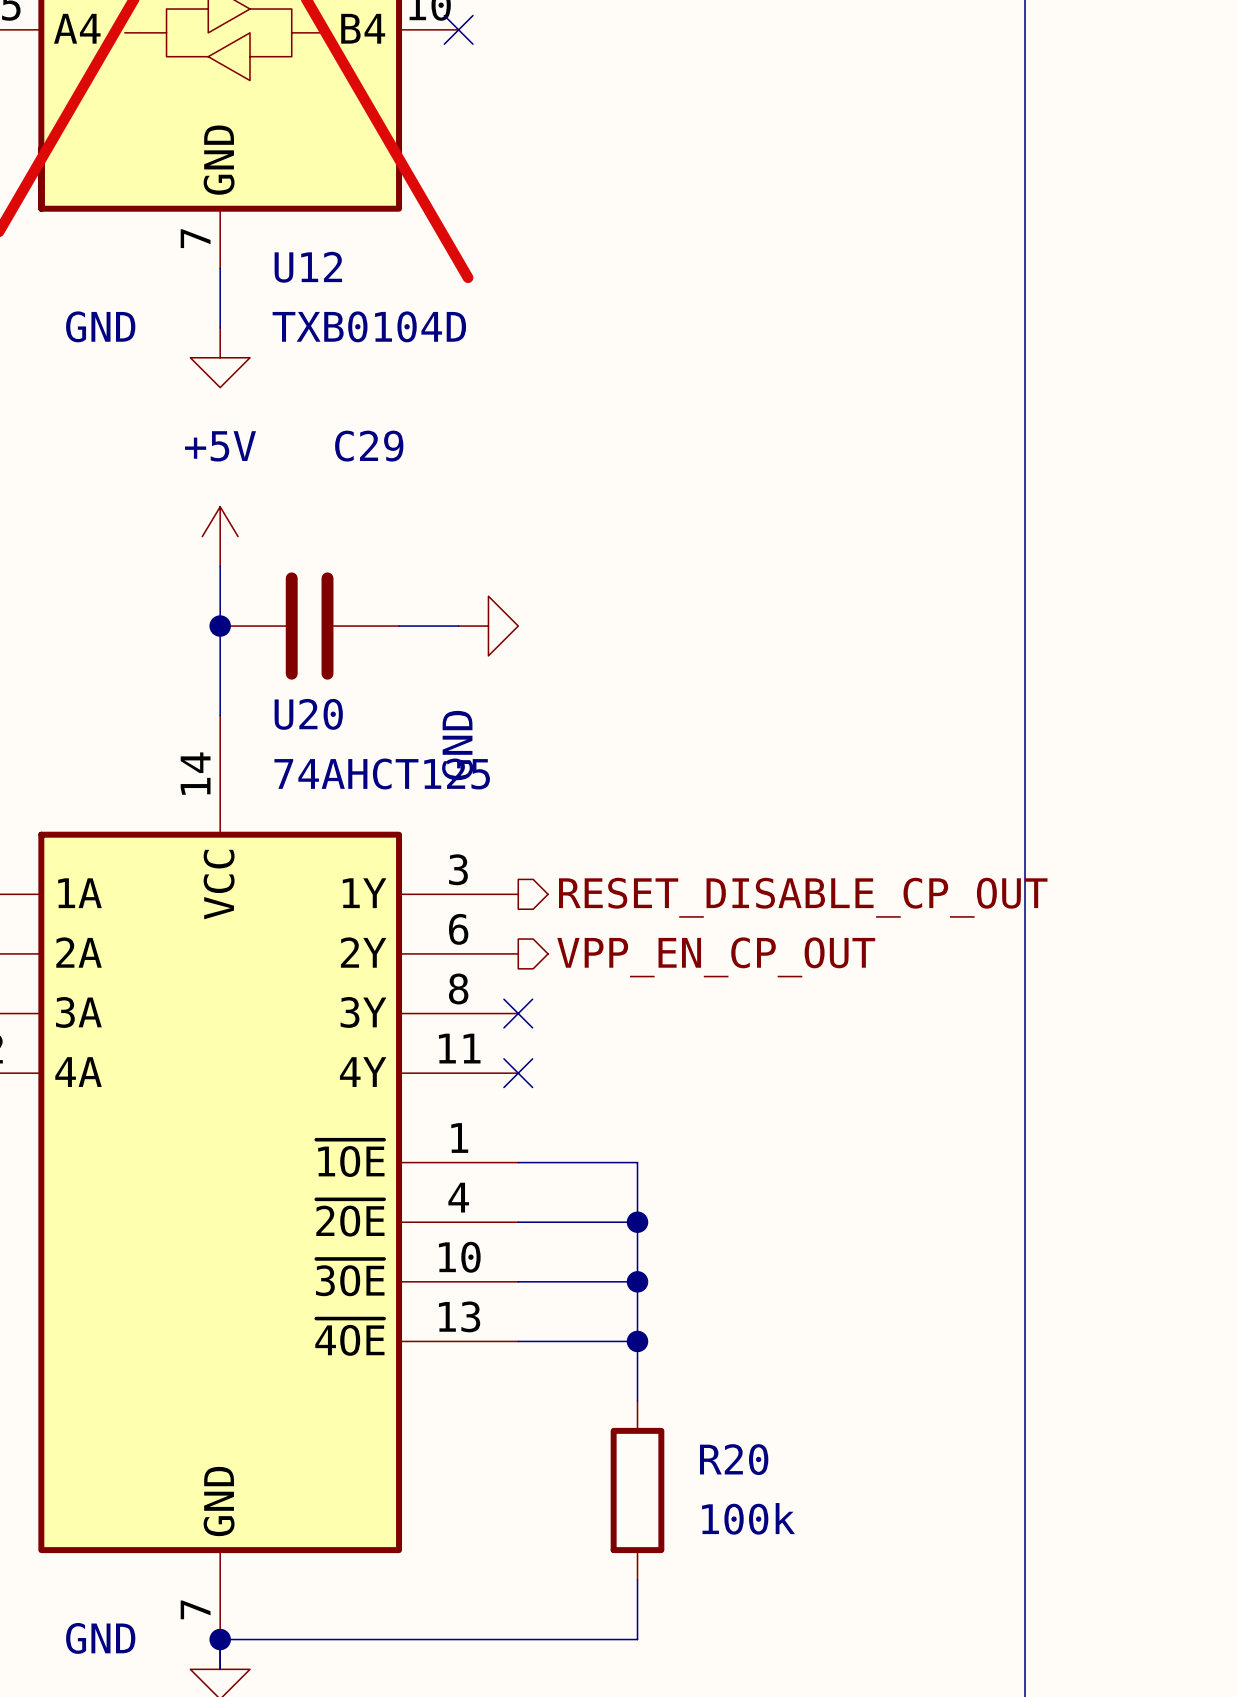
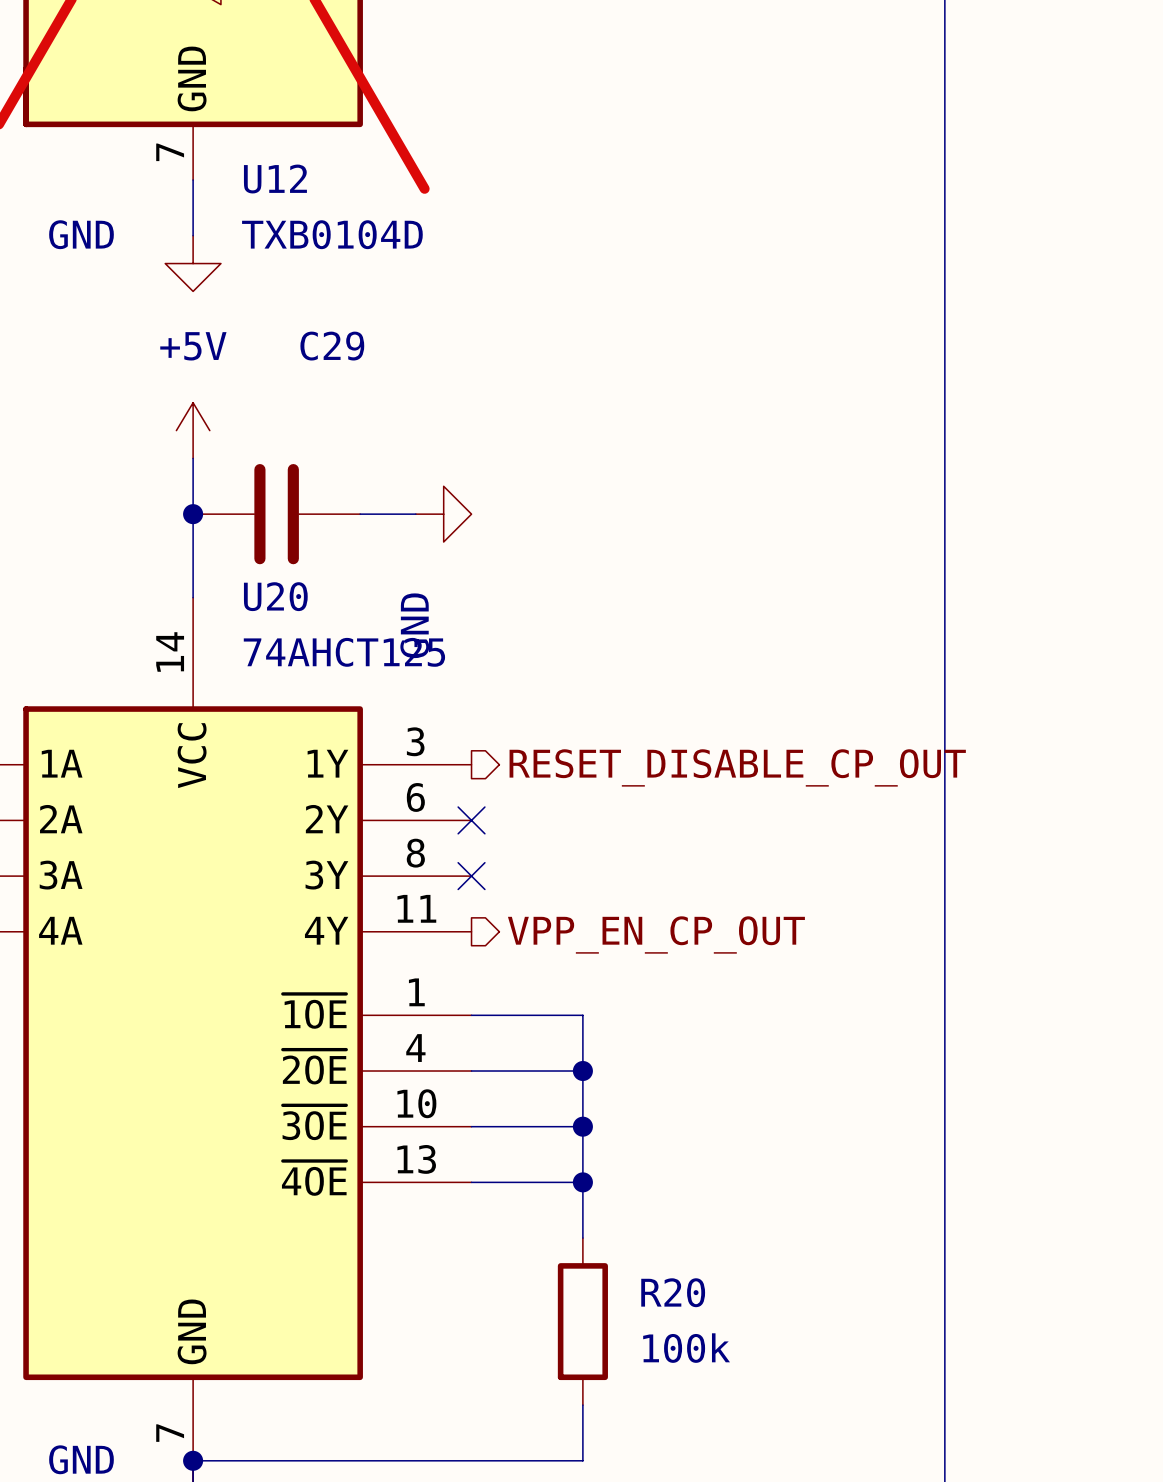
hierarchical label position: VPP_EN_CP_OUT (716, 957) -> VPP_EN_CP_OUT (656, 935)
no-connect mark position: (518, 1073) -> (471, 820)

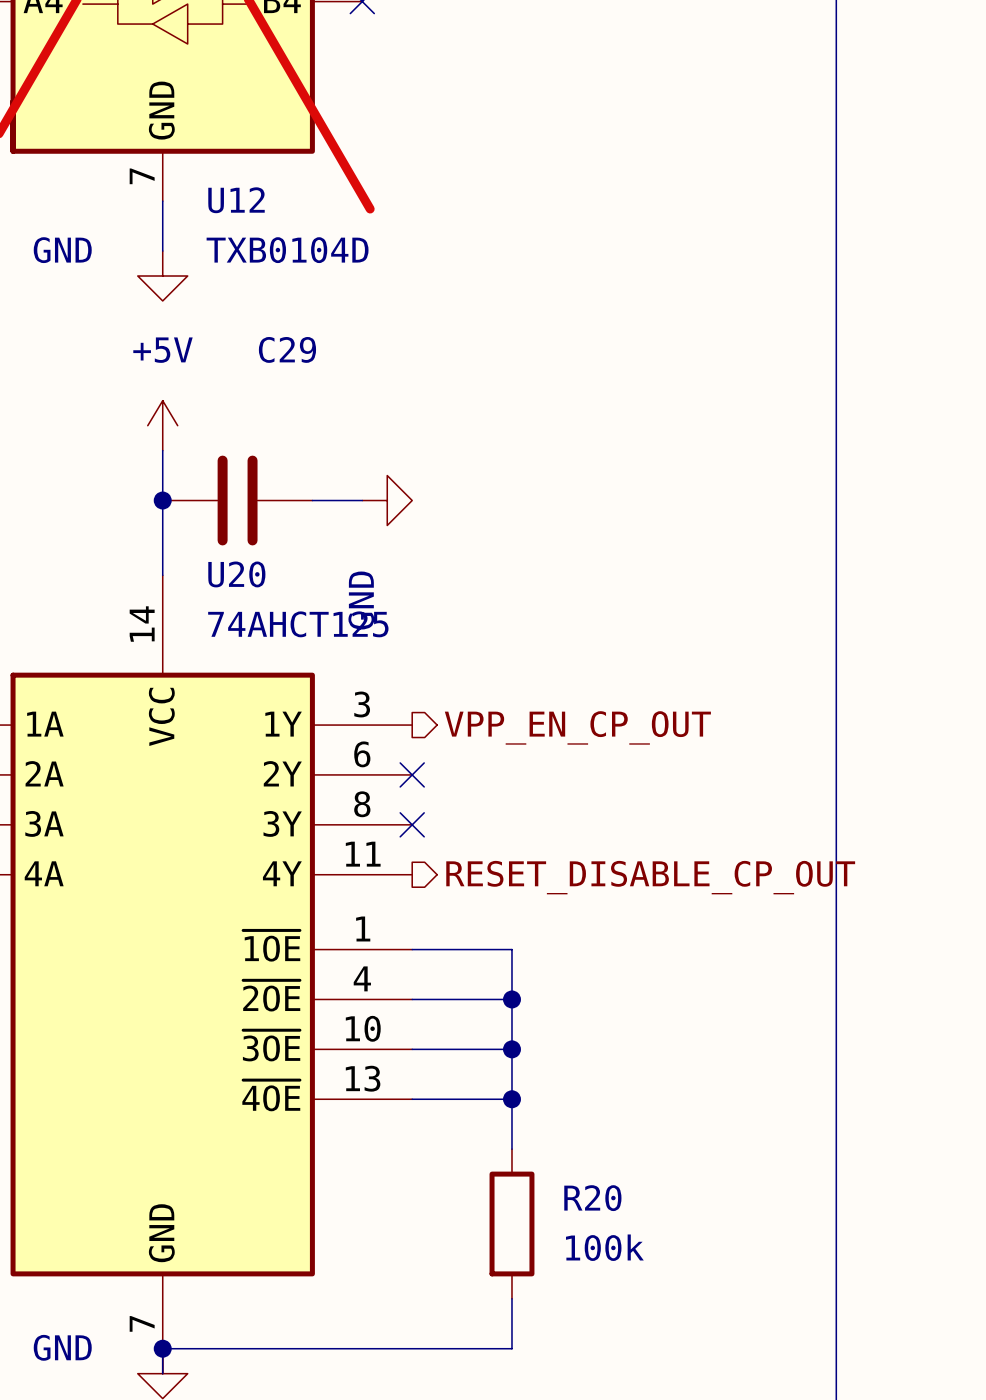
hierarchical label: RESET_DISABLE_CP_OUT (737, 767) -> VPP_EN_CP_OUT (577, 727)
hierarchical label: VPP_EN_CP_OUT (656, 935) -> RESET_DISABLE_CP_OUT (650, 877)

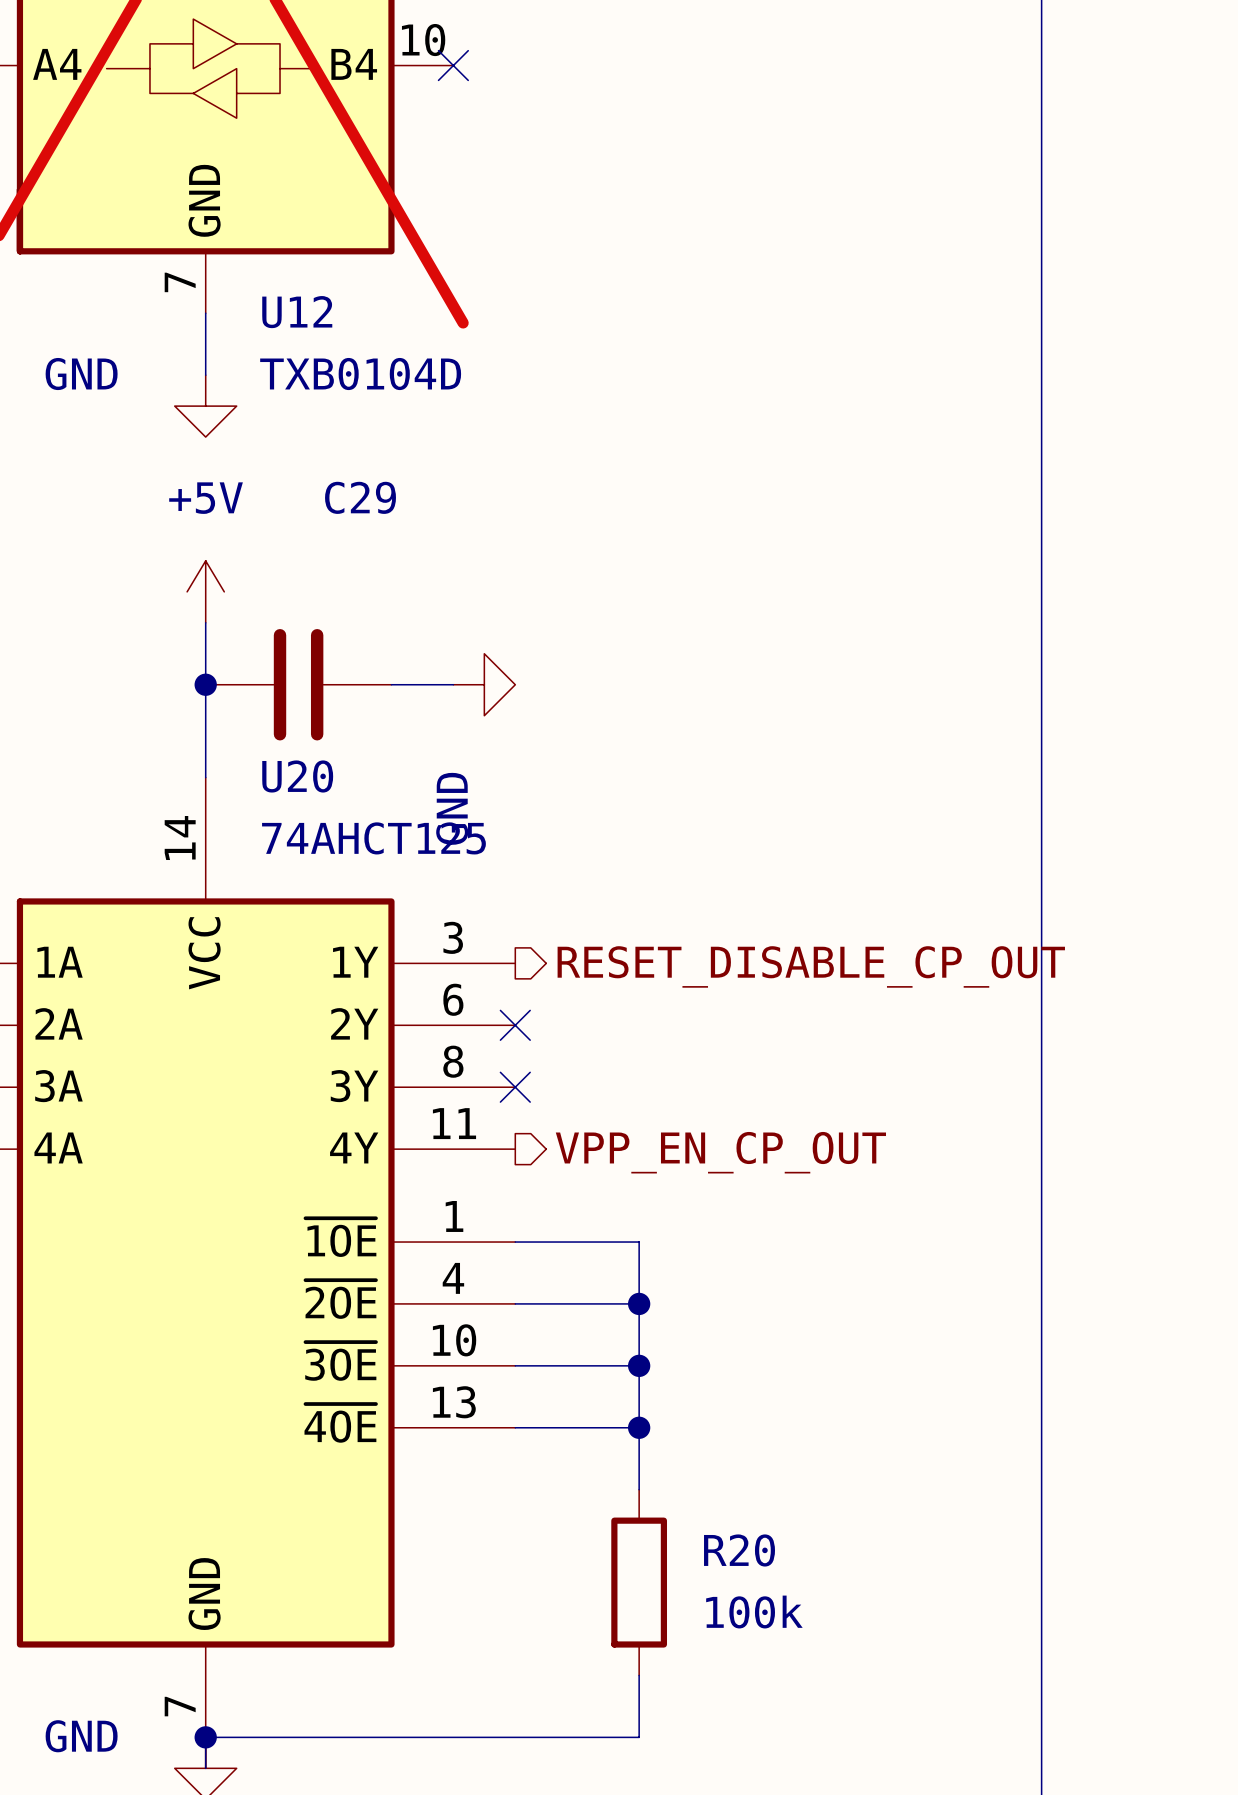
hierarchical label: VPP_EN_CP_OUT (577, 727) -> RESET_DISABLE_CP_OUT (811, 966)
hierarchical label: RESET_DISABLE_CP_OUT (650, 877) -> VPP_EN_CP_OUT (720, 1152)

